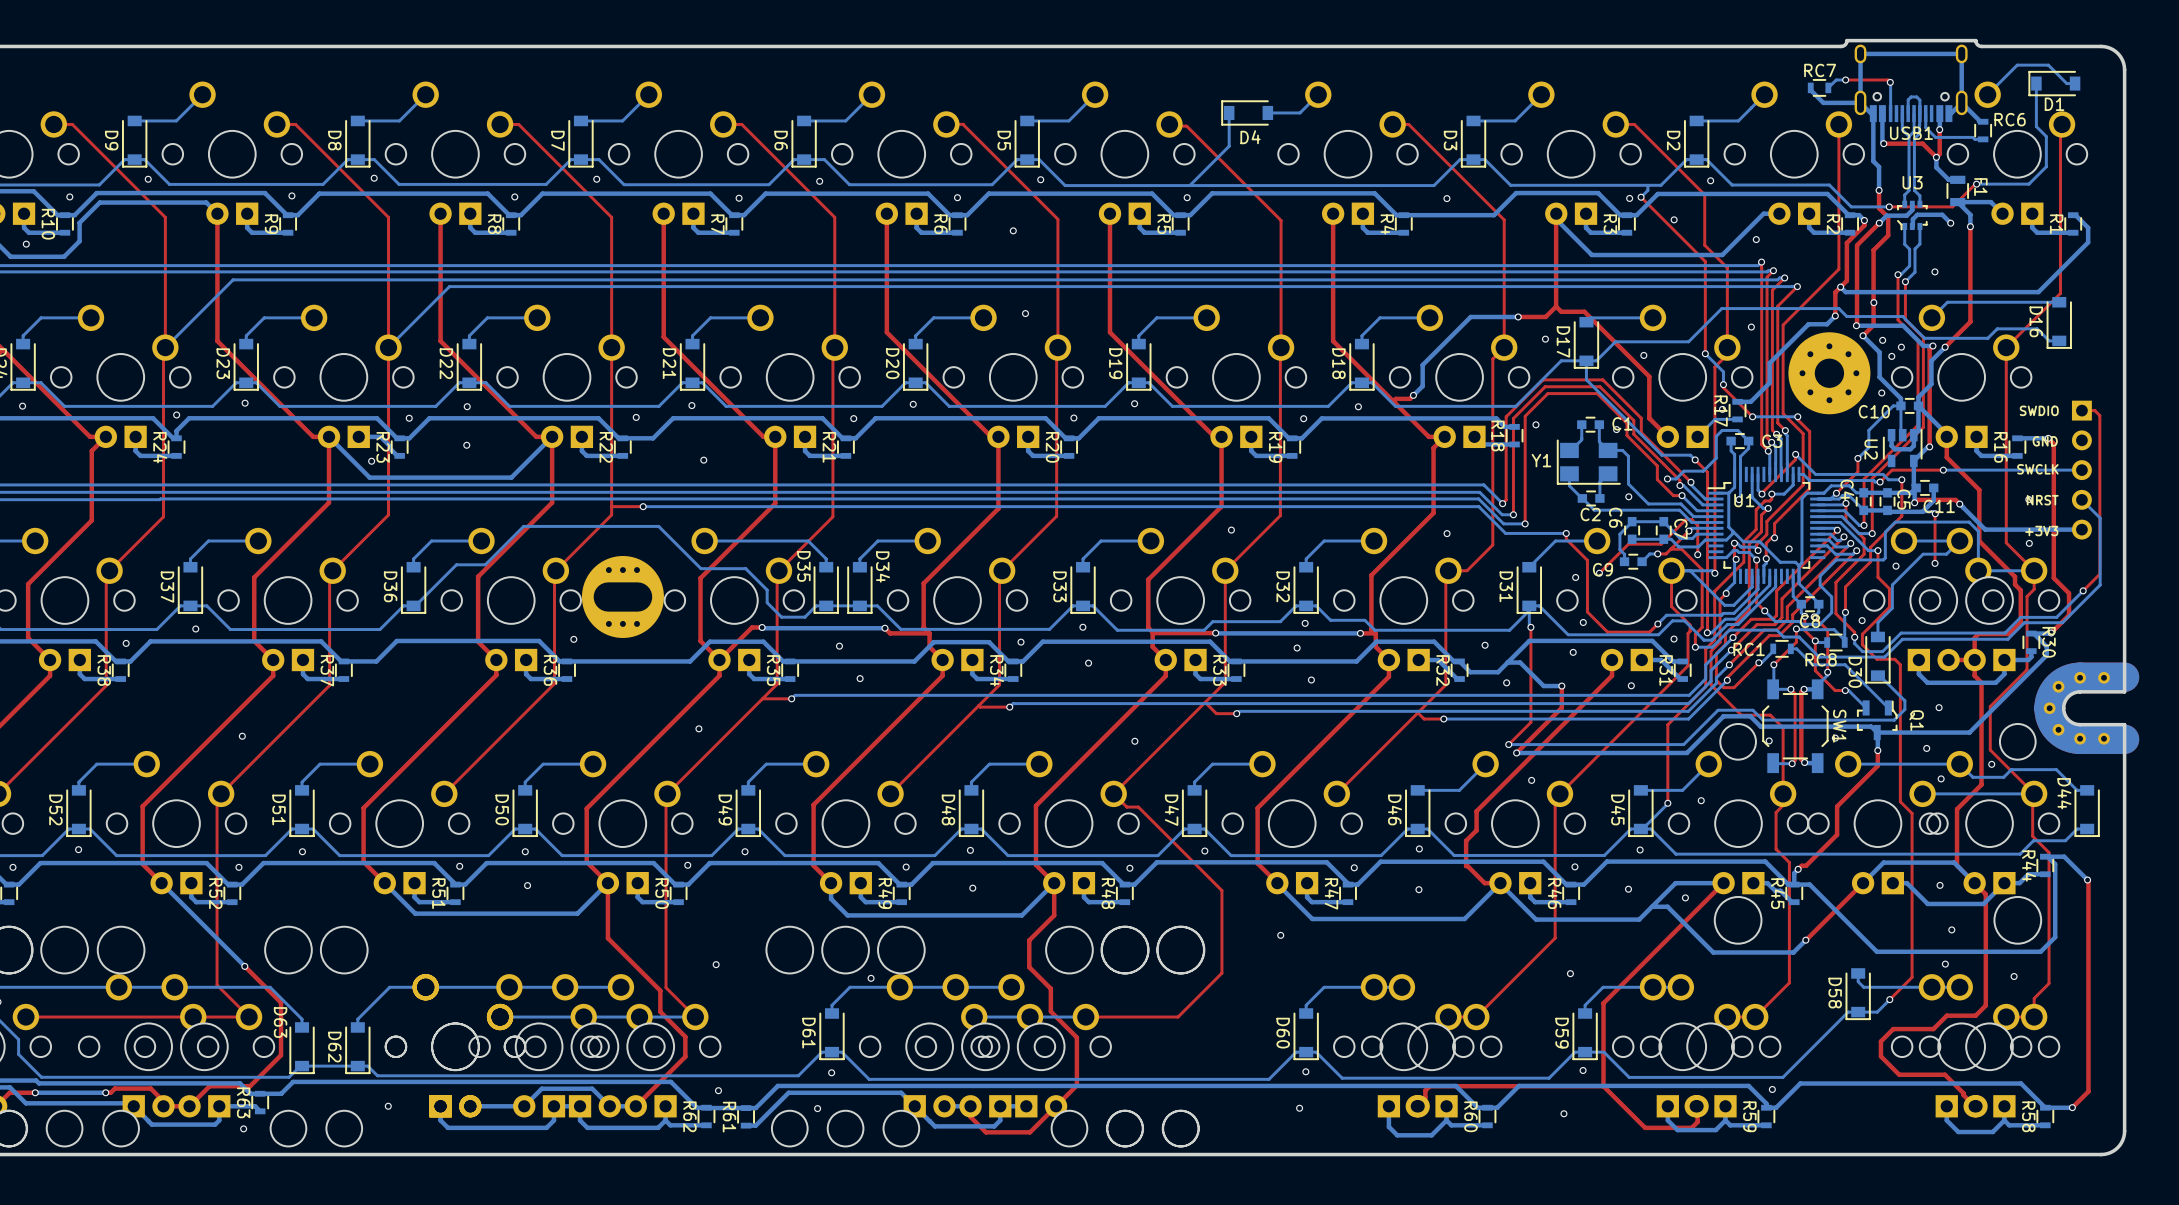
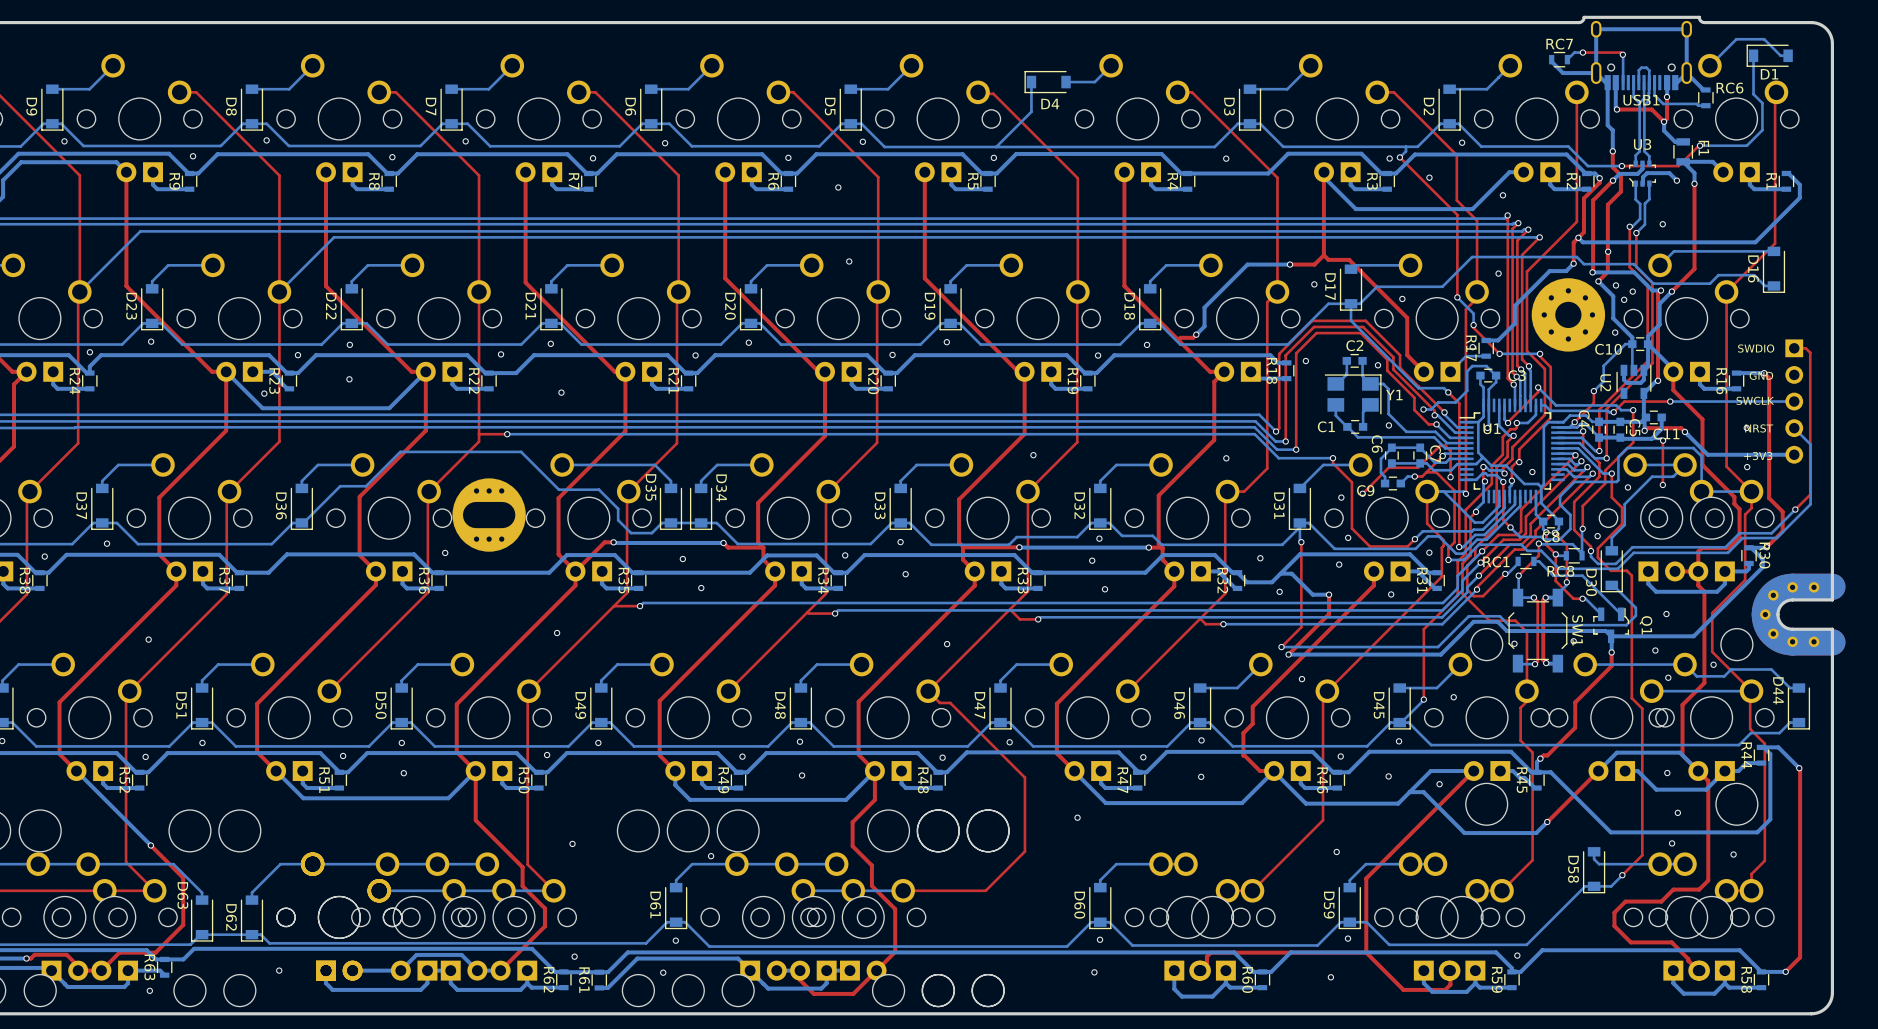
C1 name: C1 (1622, 423) -> C2 (1354, 345)
Y1 rotation: 0° (1588, 462) -> 180° (1353, 394)
C2 name: C2 (1590, 514) -> C1 (1326, 426)

